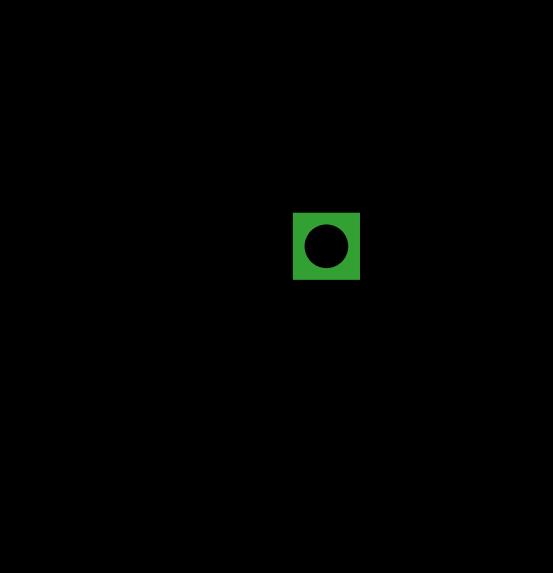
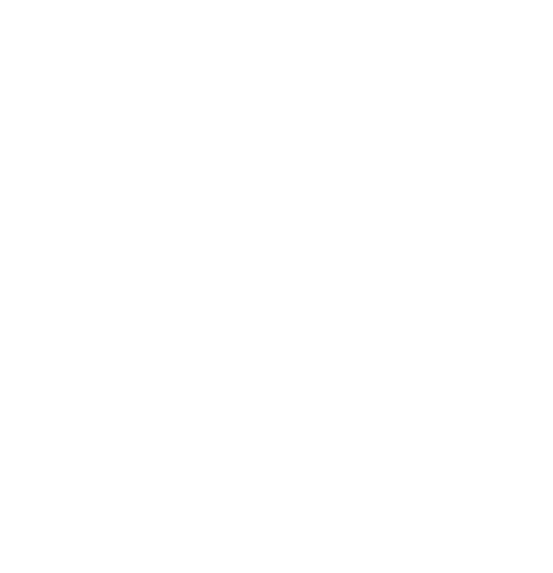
part: (326, 246) -> none

